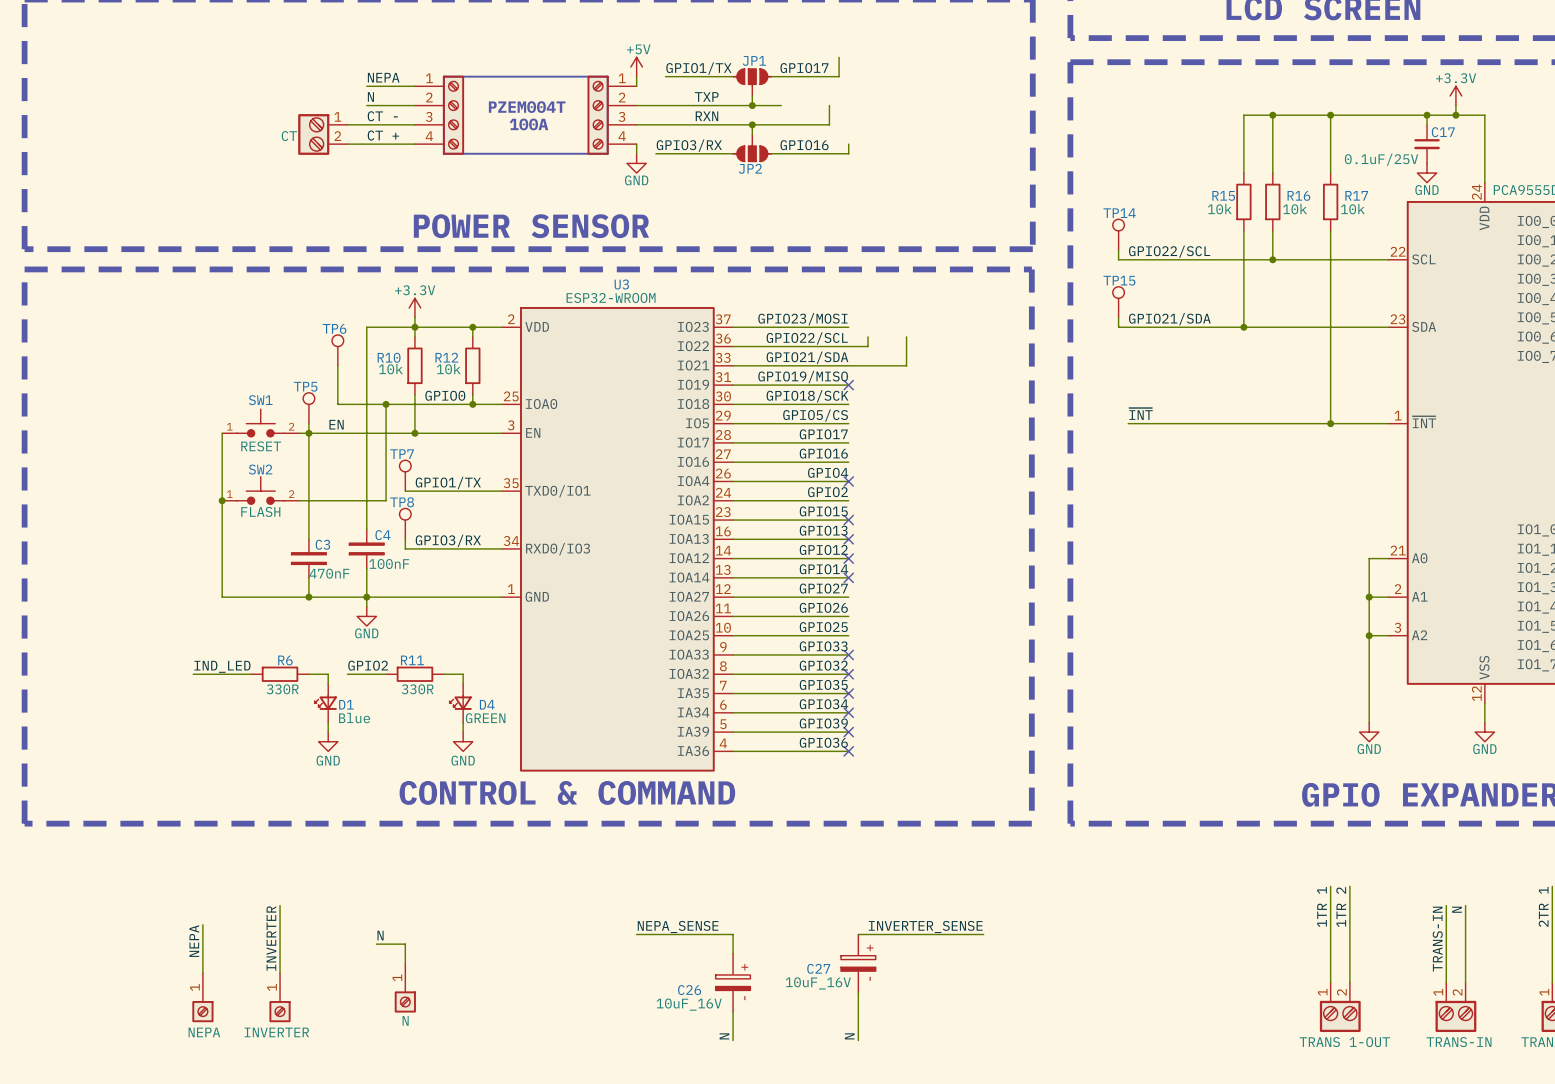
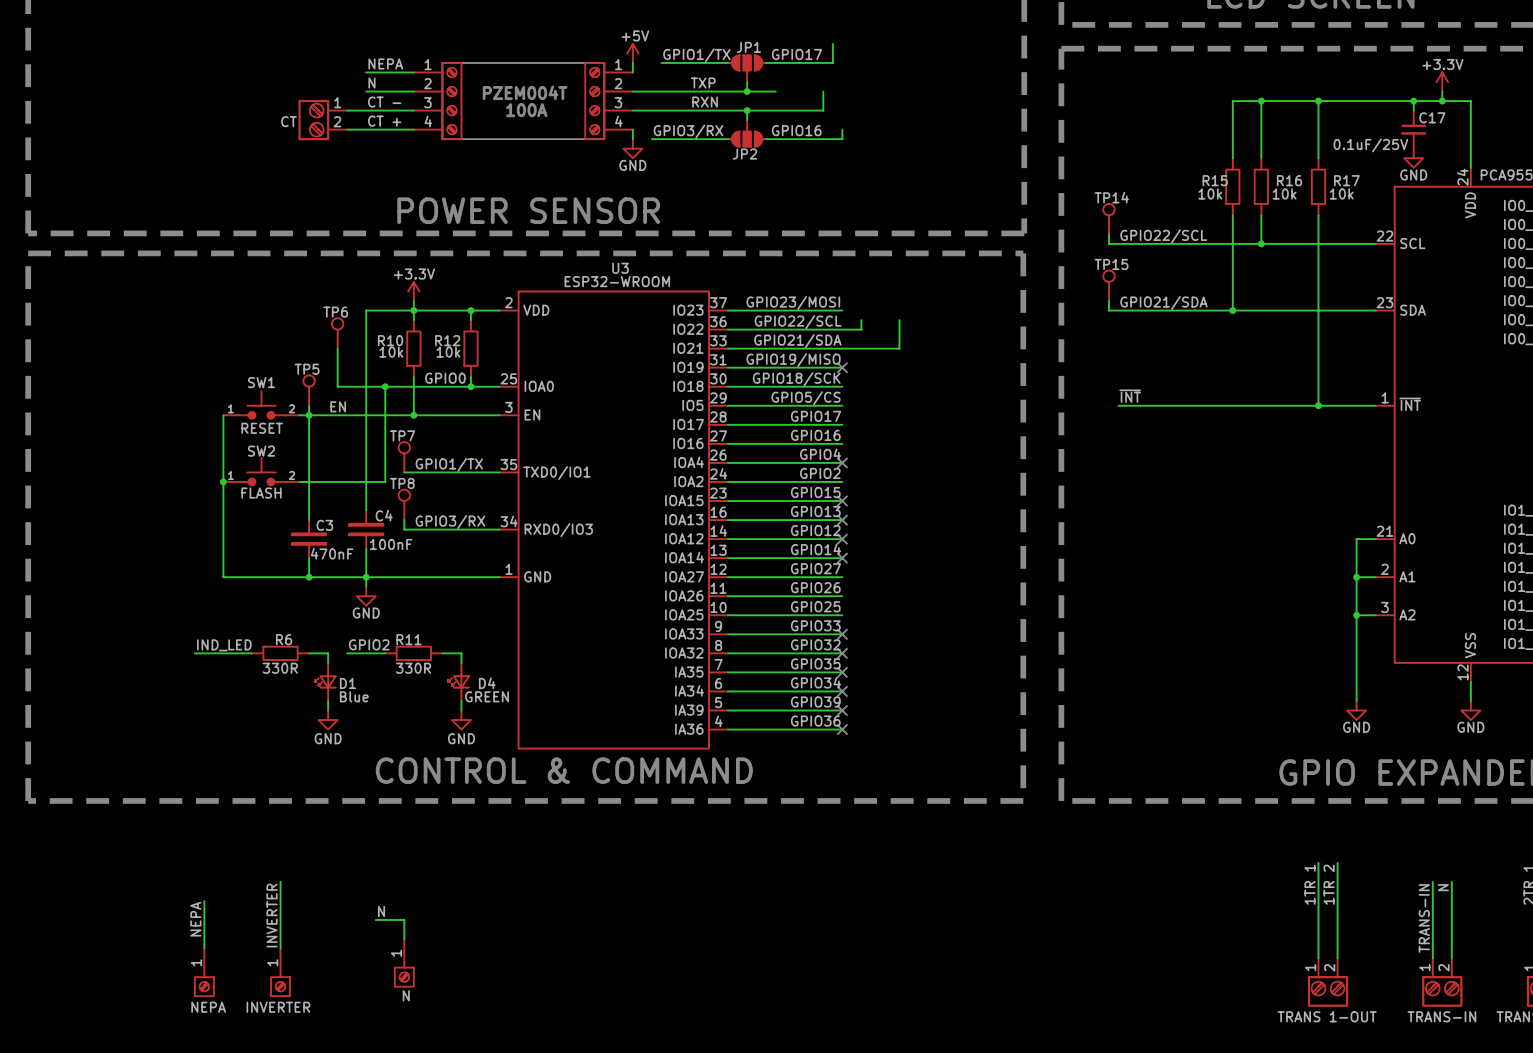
label: NEPA_SENSE (678, 926) -> none
label: INVERTER_SENSE (925, 926) -> none
wire: (636, 934) (733, 934) (733, 953) -> none
wire: (858, 934) (983, 934) -> none
C27: 10uF_16V (858, 963) -> none
C26: 10uF_16V (733, 982) -> none
wire: (858, 992) (858, 1040) -> none
wire: (733, 1011) (733, 1040) -> none
label: N (724, 1036) -> none
label: N (849, 1036) -> none

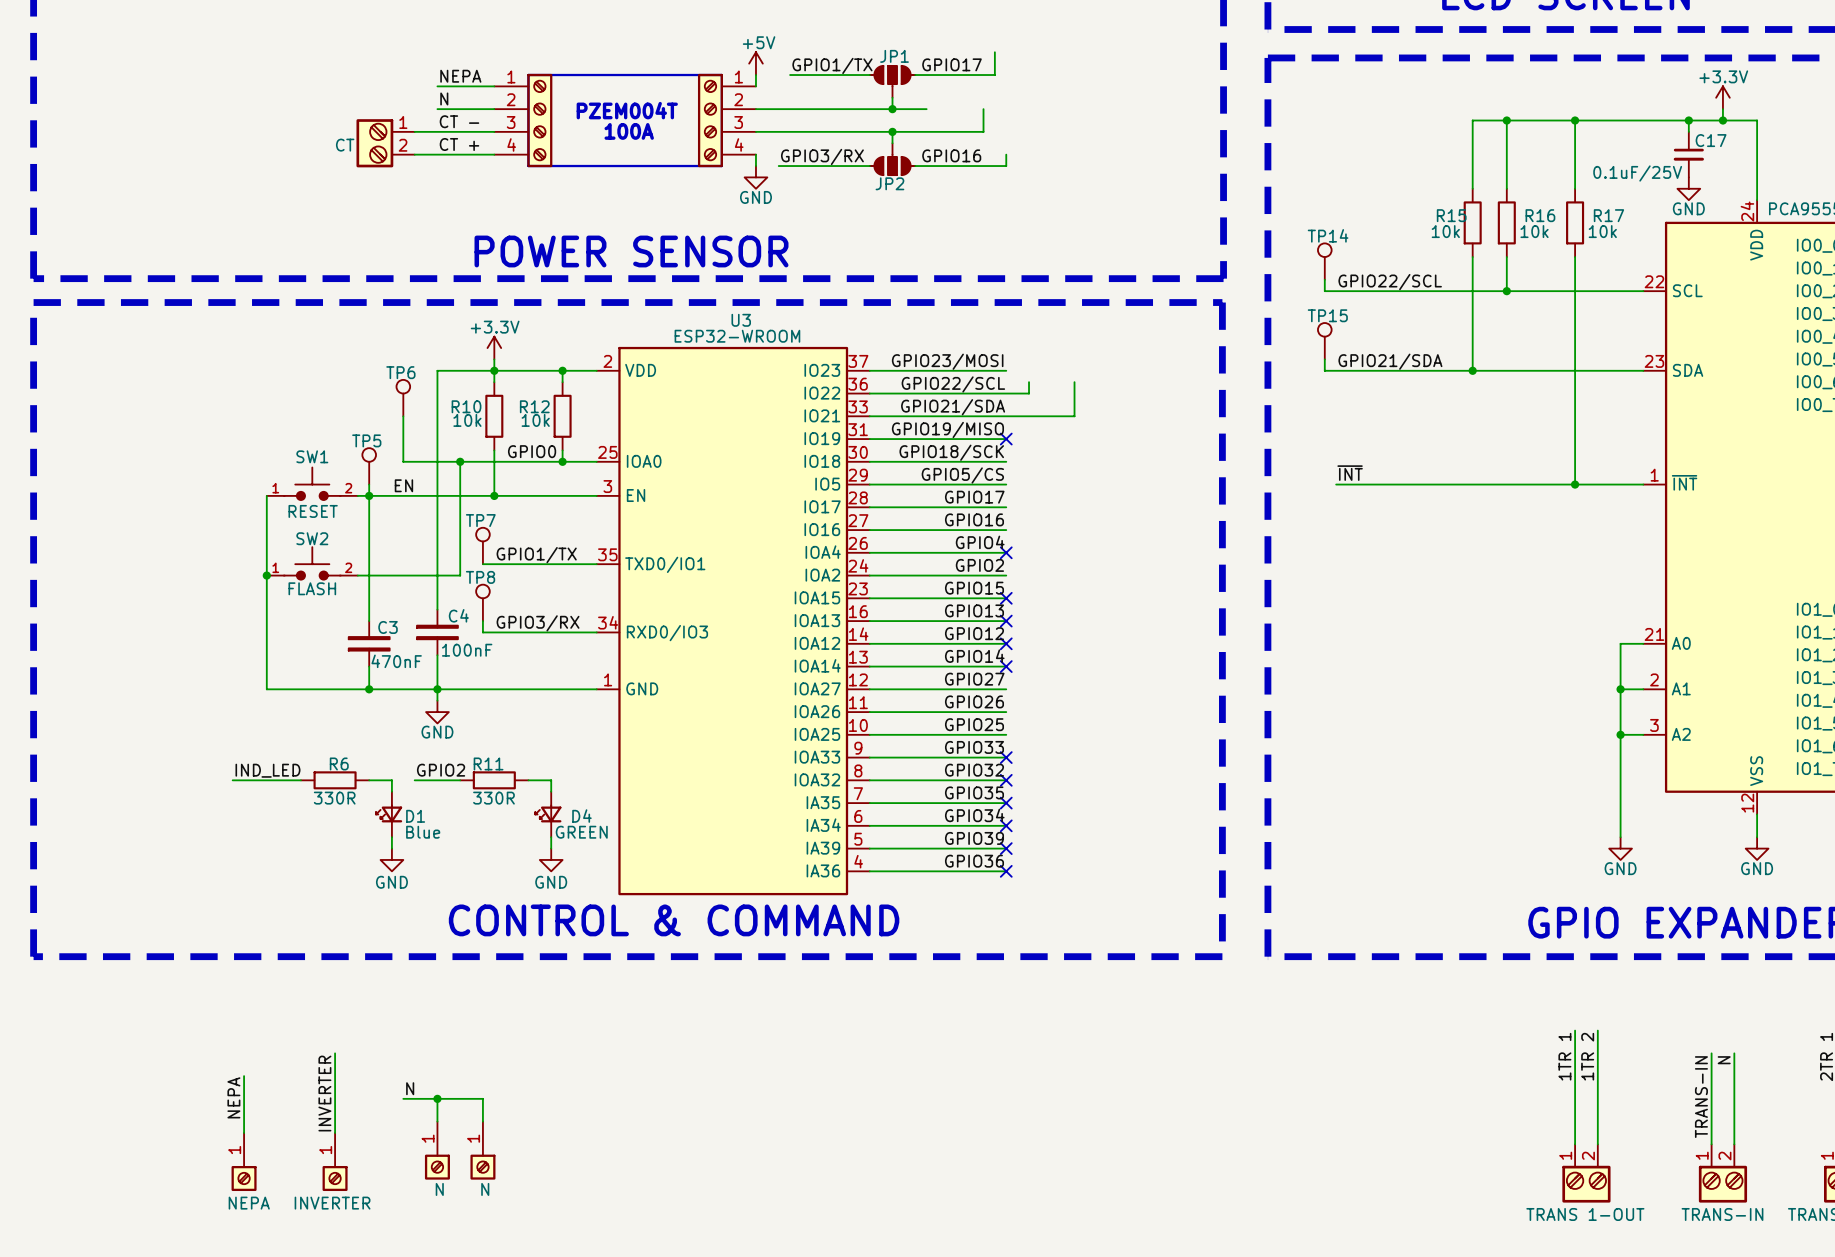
label: TXP (703, 83) -> none
label: RXN (705, 102) -> none
label position: N (381, 911) -> N (410, 1088)
wire: none -> (403, 1098) (448, 1098)
wire: none -> (437, 1098) (437, 1121)
junction: none -> (437, 1098)
part: none -> N (437, 1150)

